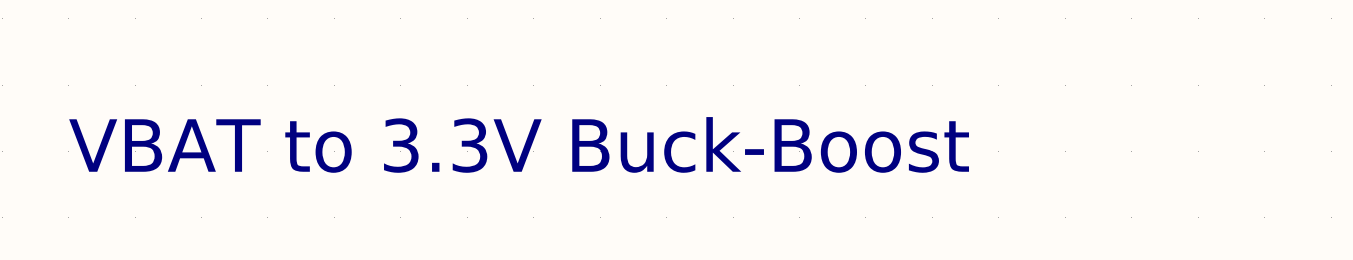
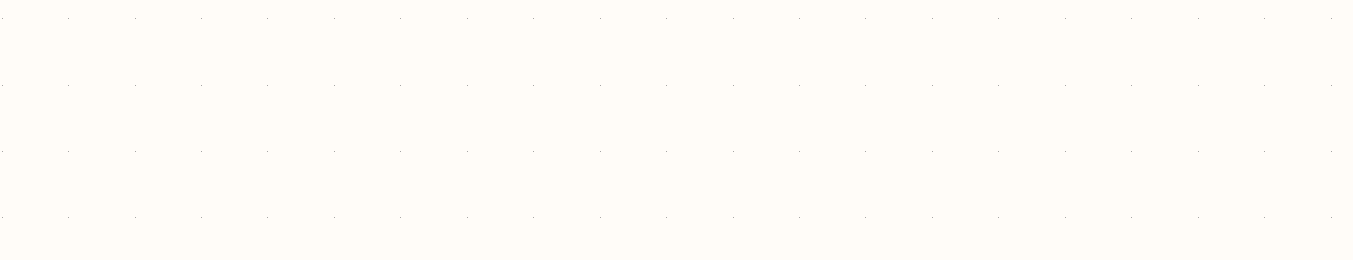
text: VBAT to 3.3V Buck-Boost (519, 144) -> none

